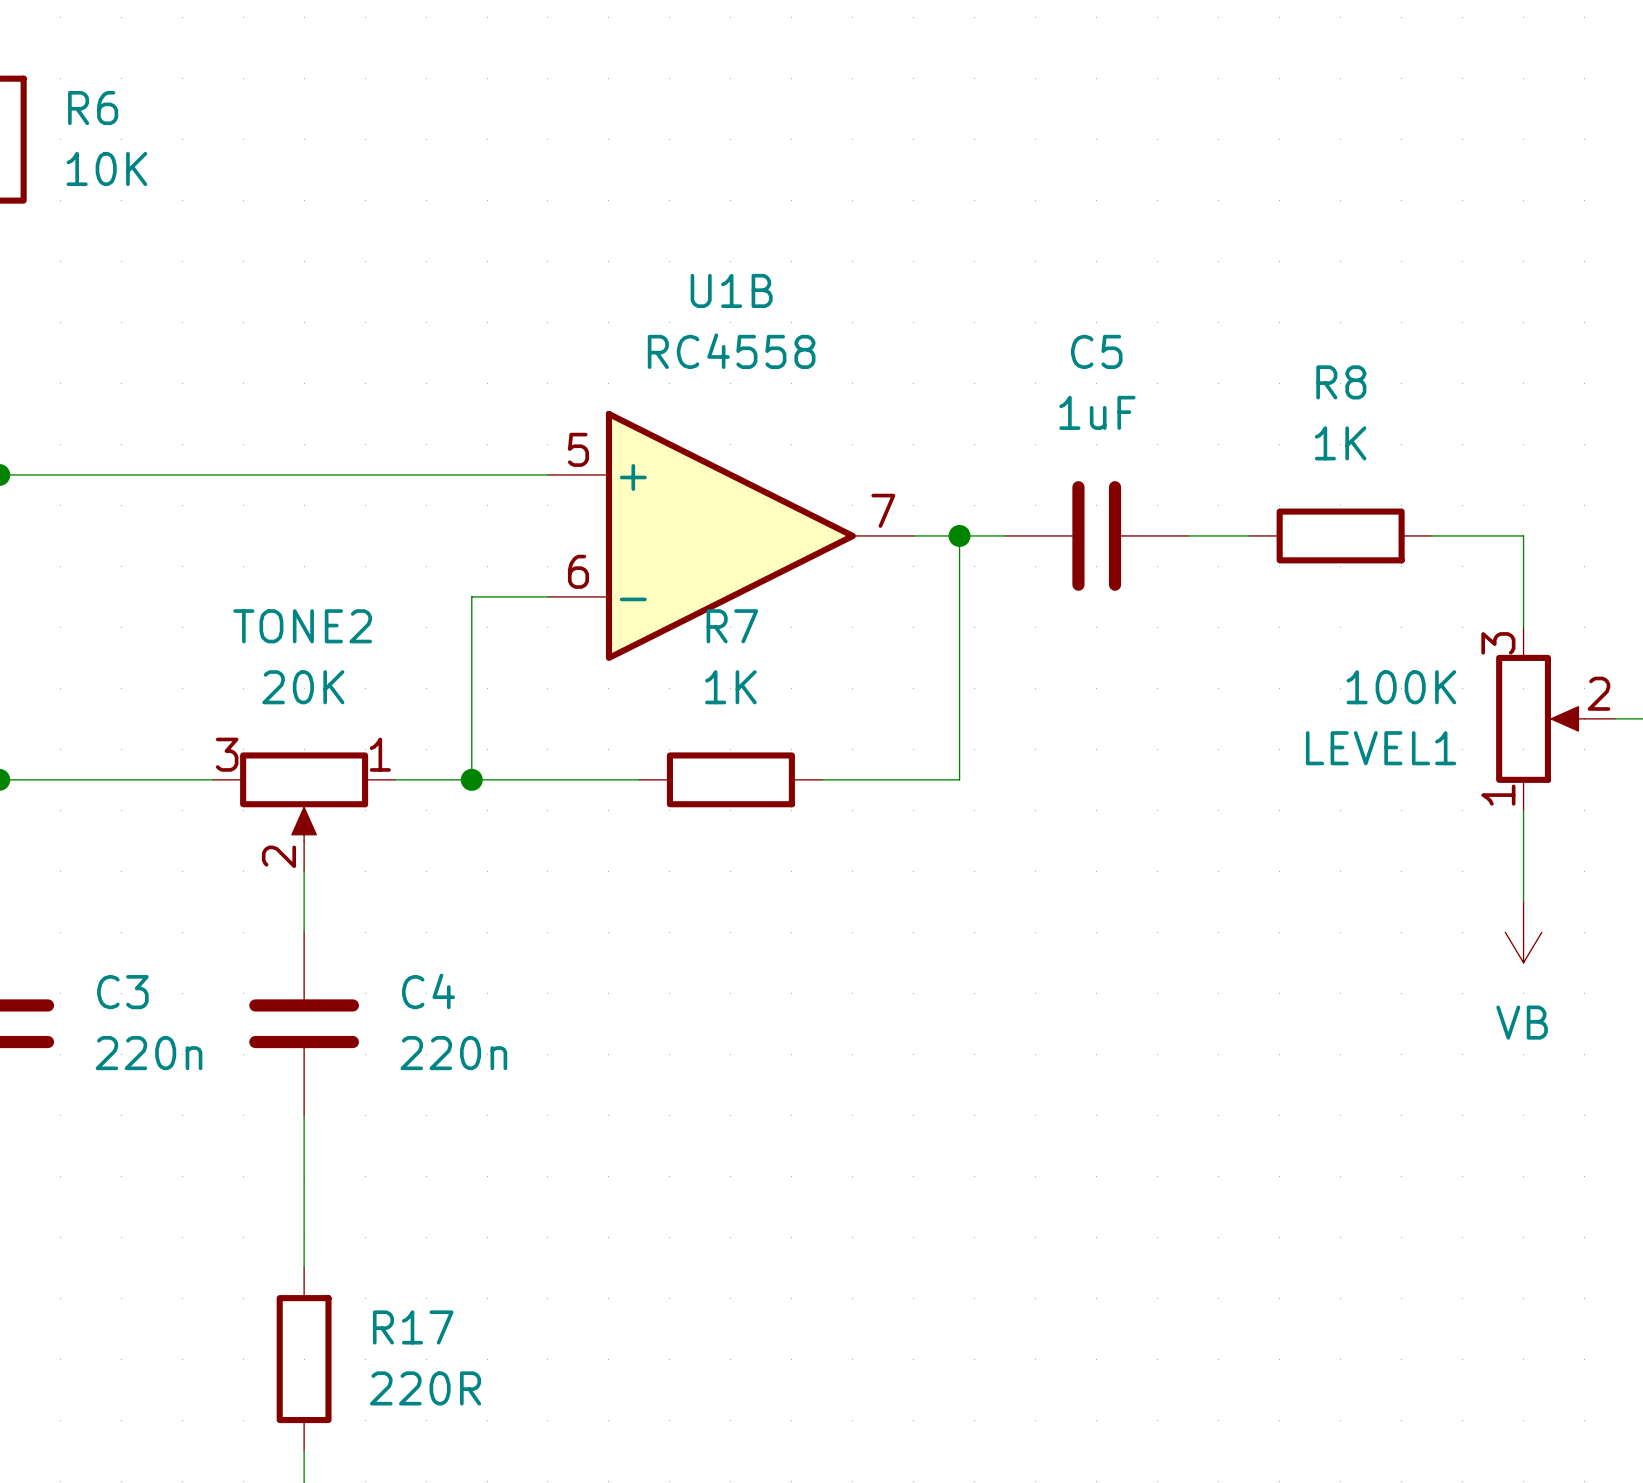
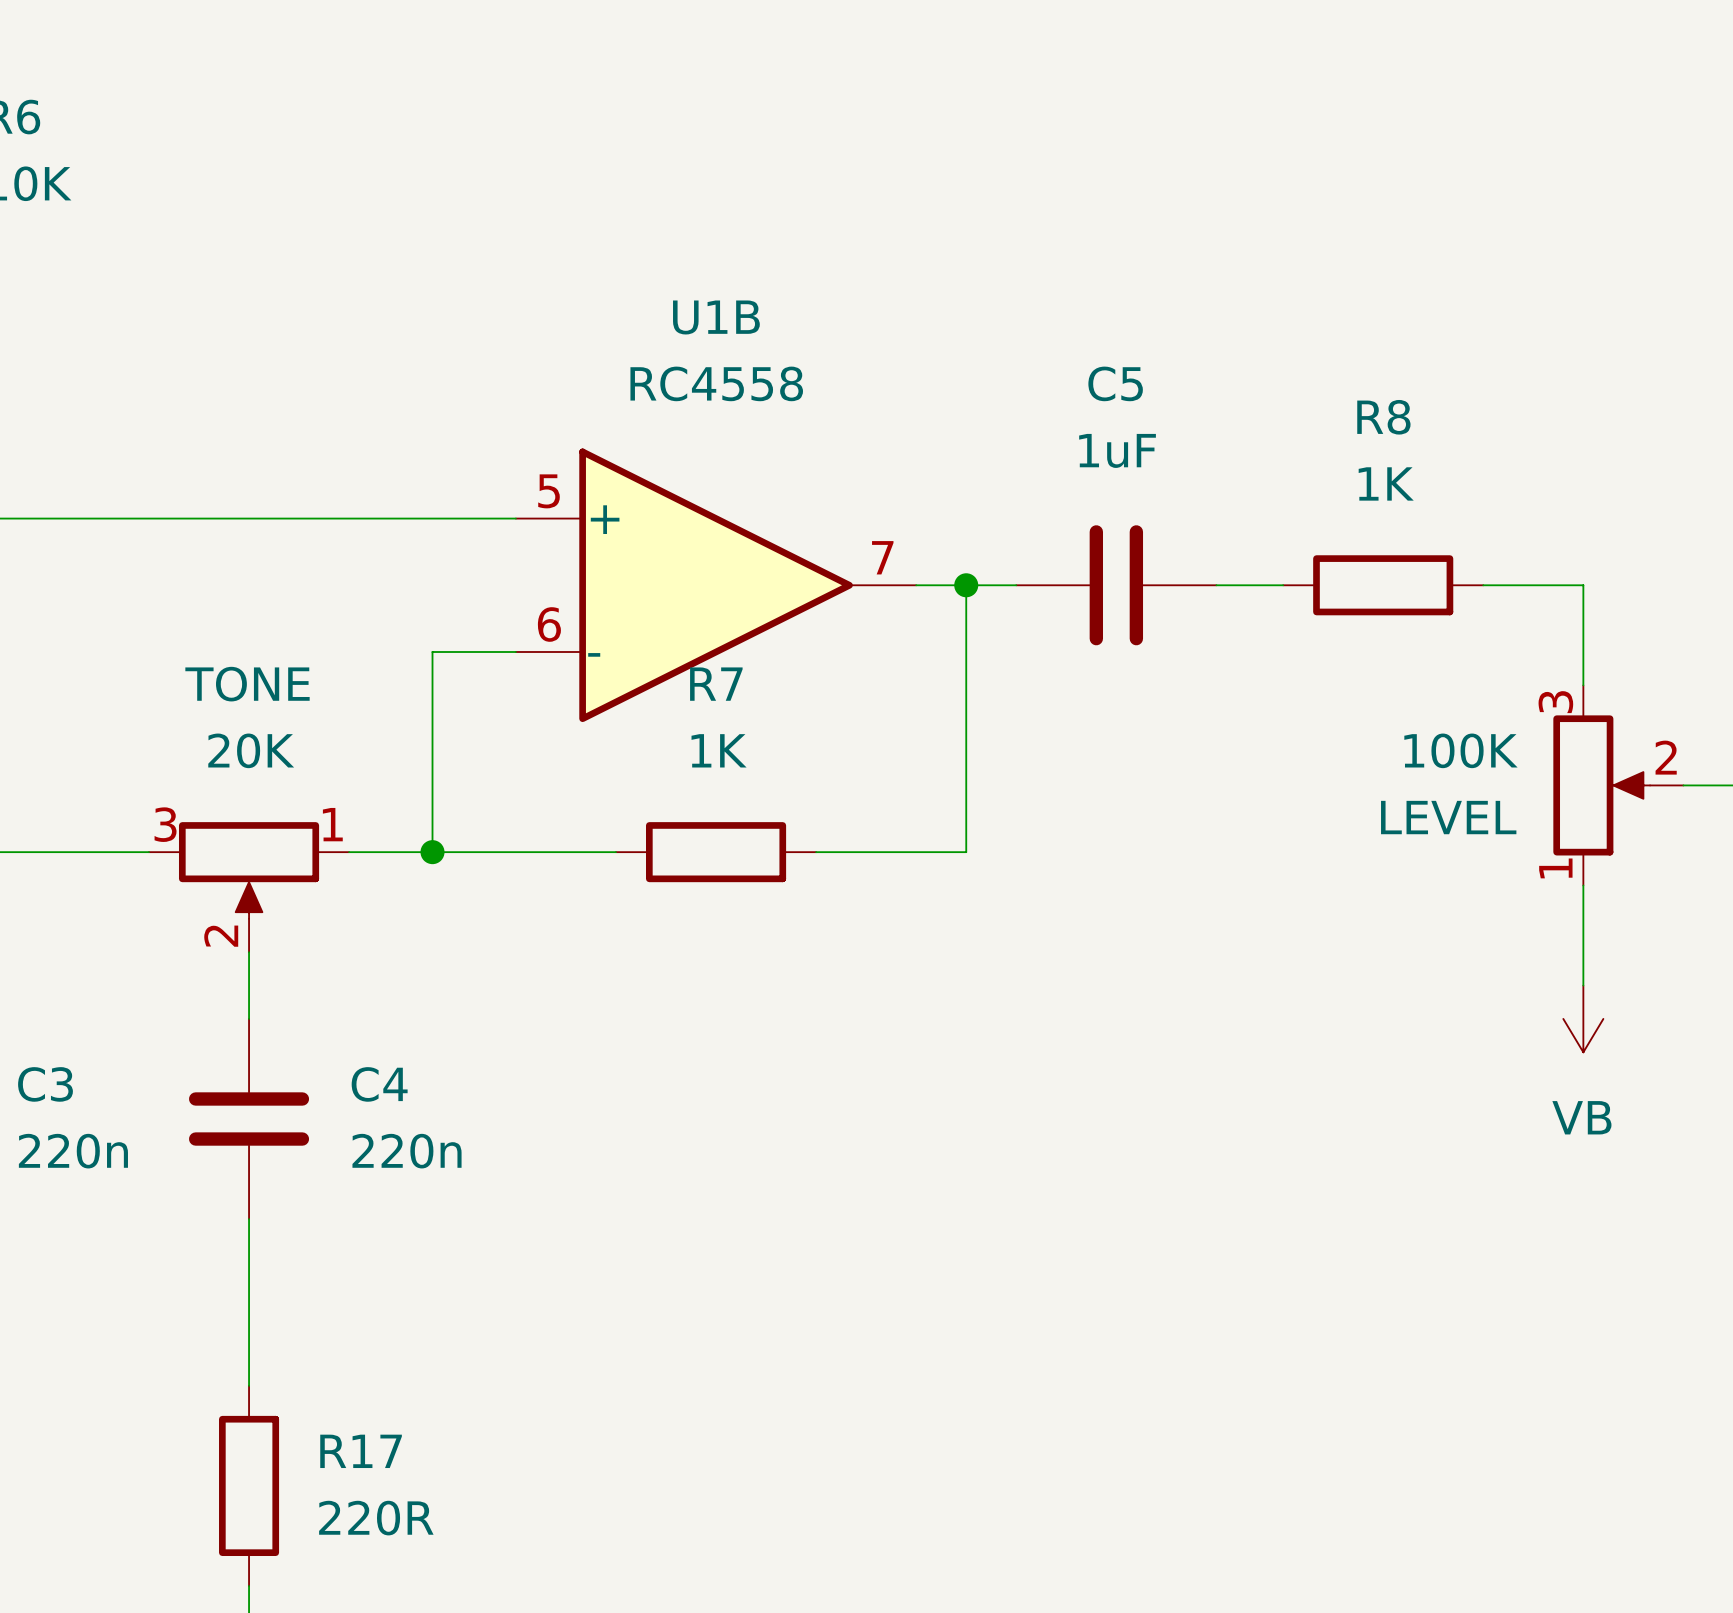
TONE2 name: TONE2 (302, 626) -> TONE (247, 684)
LEVEL1 name: LEVEL1 (1381, 748) -> LEVEL (1448, 817)

